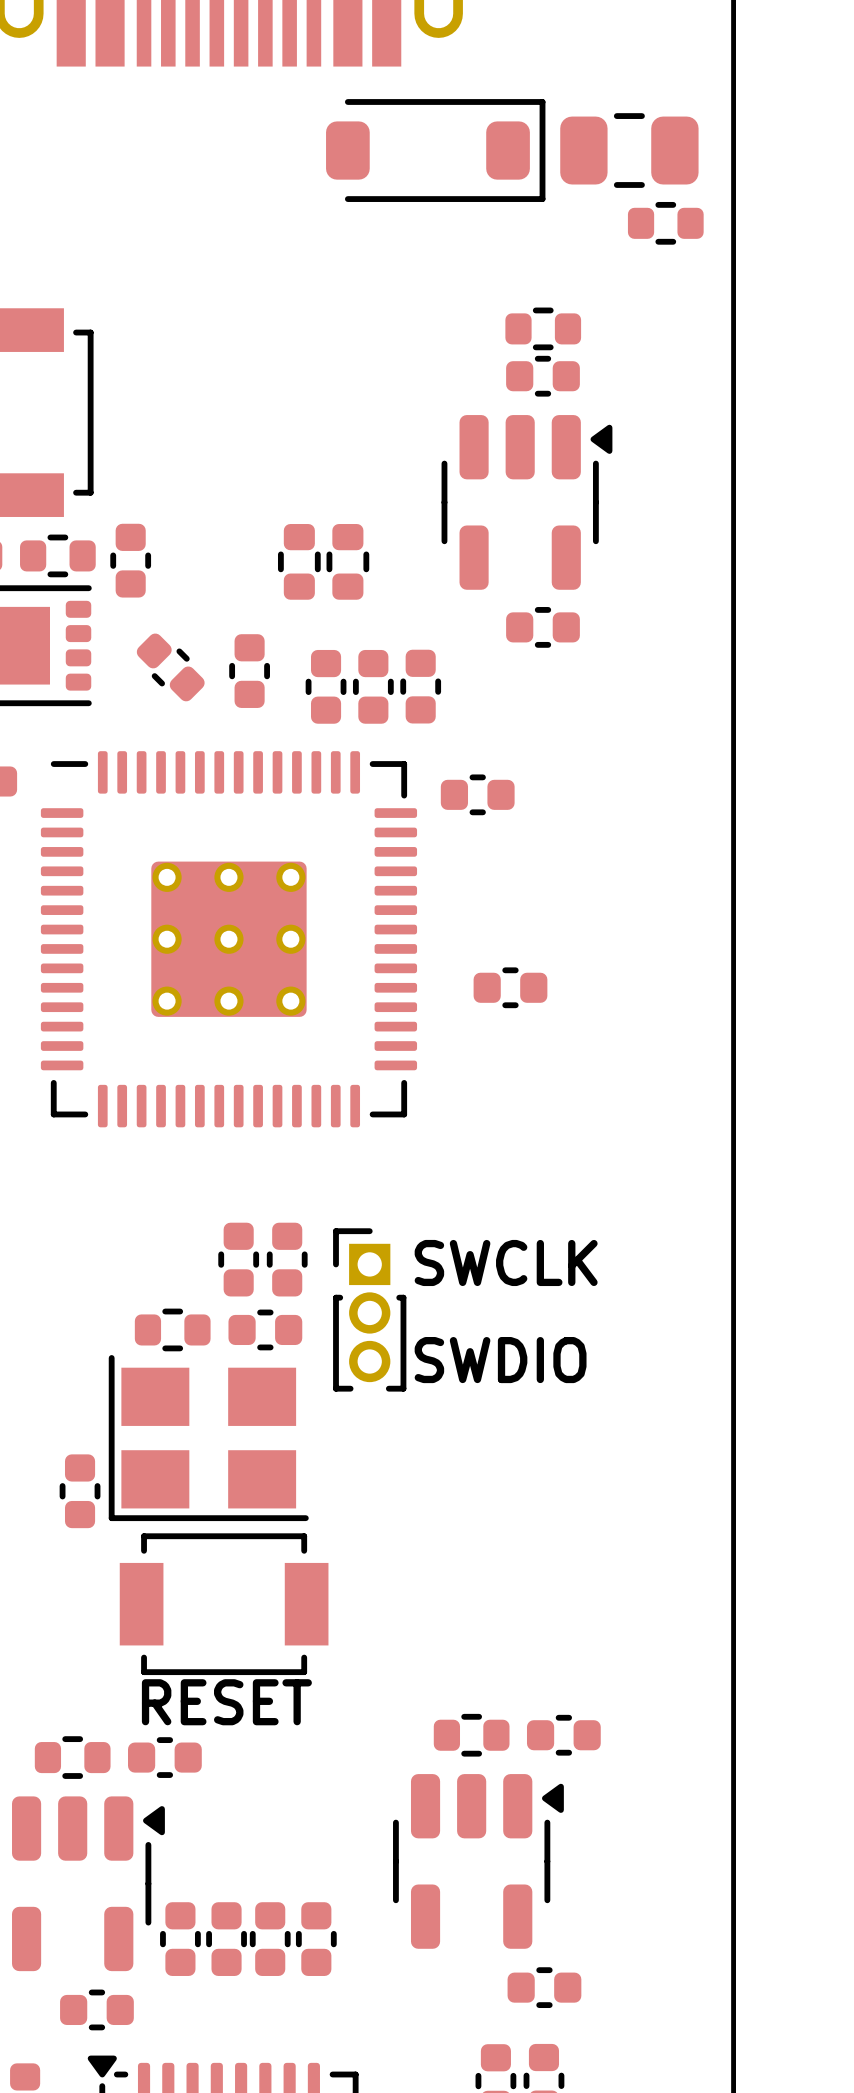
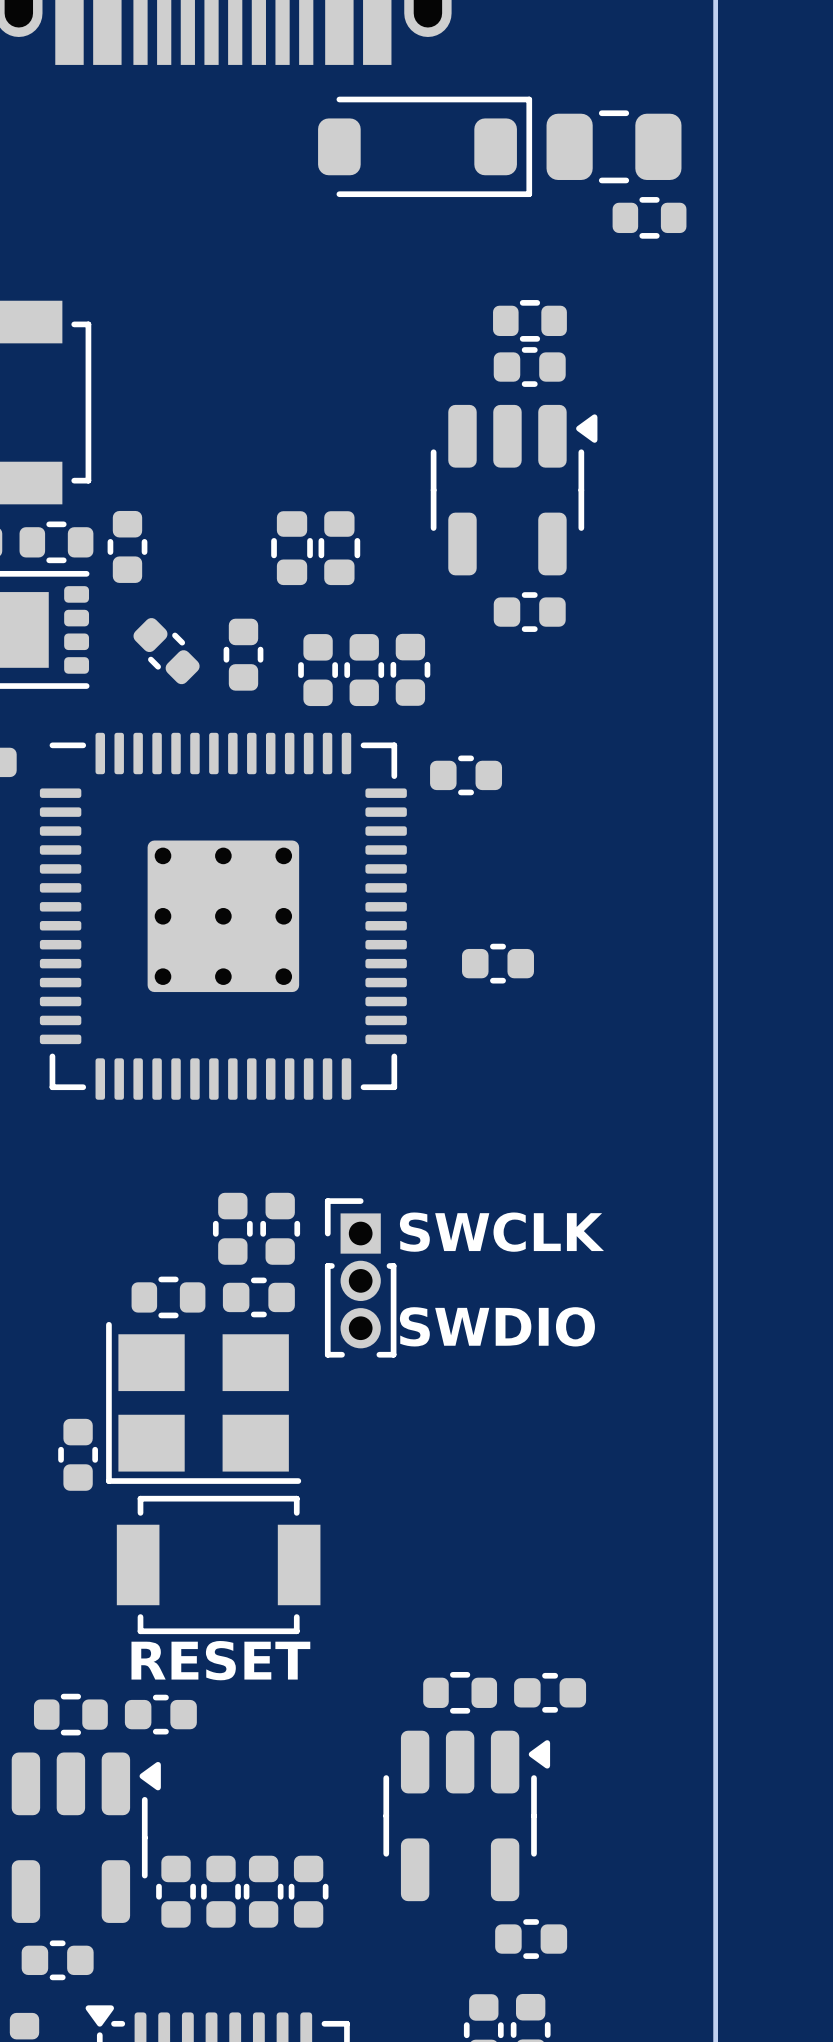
part position: (96, 2009) -> (57, 1960)

